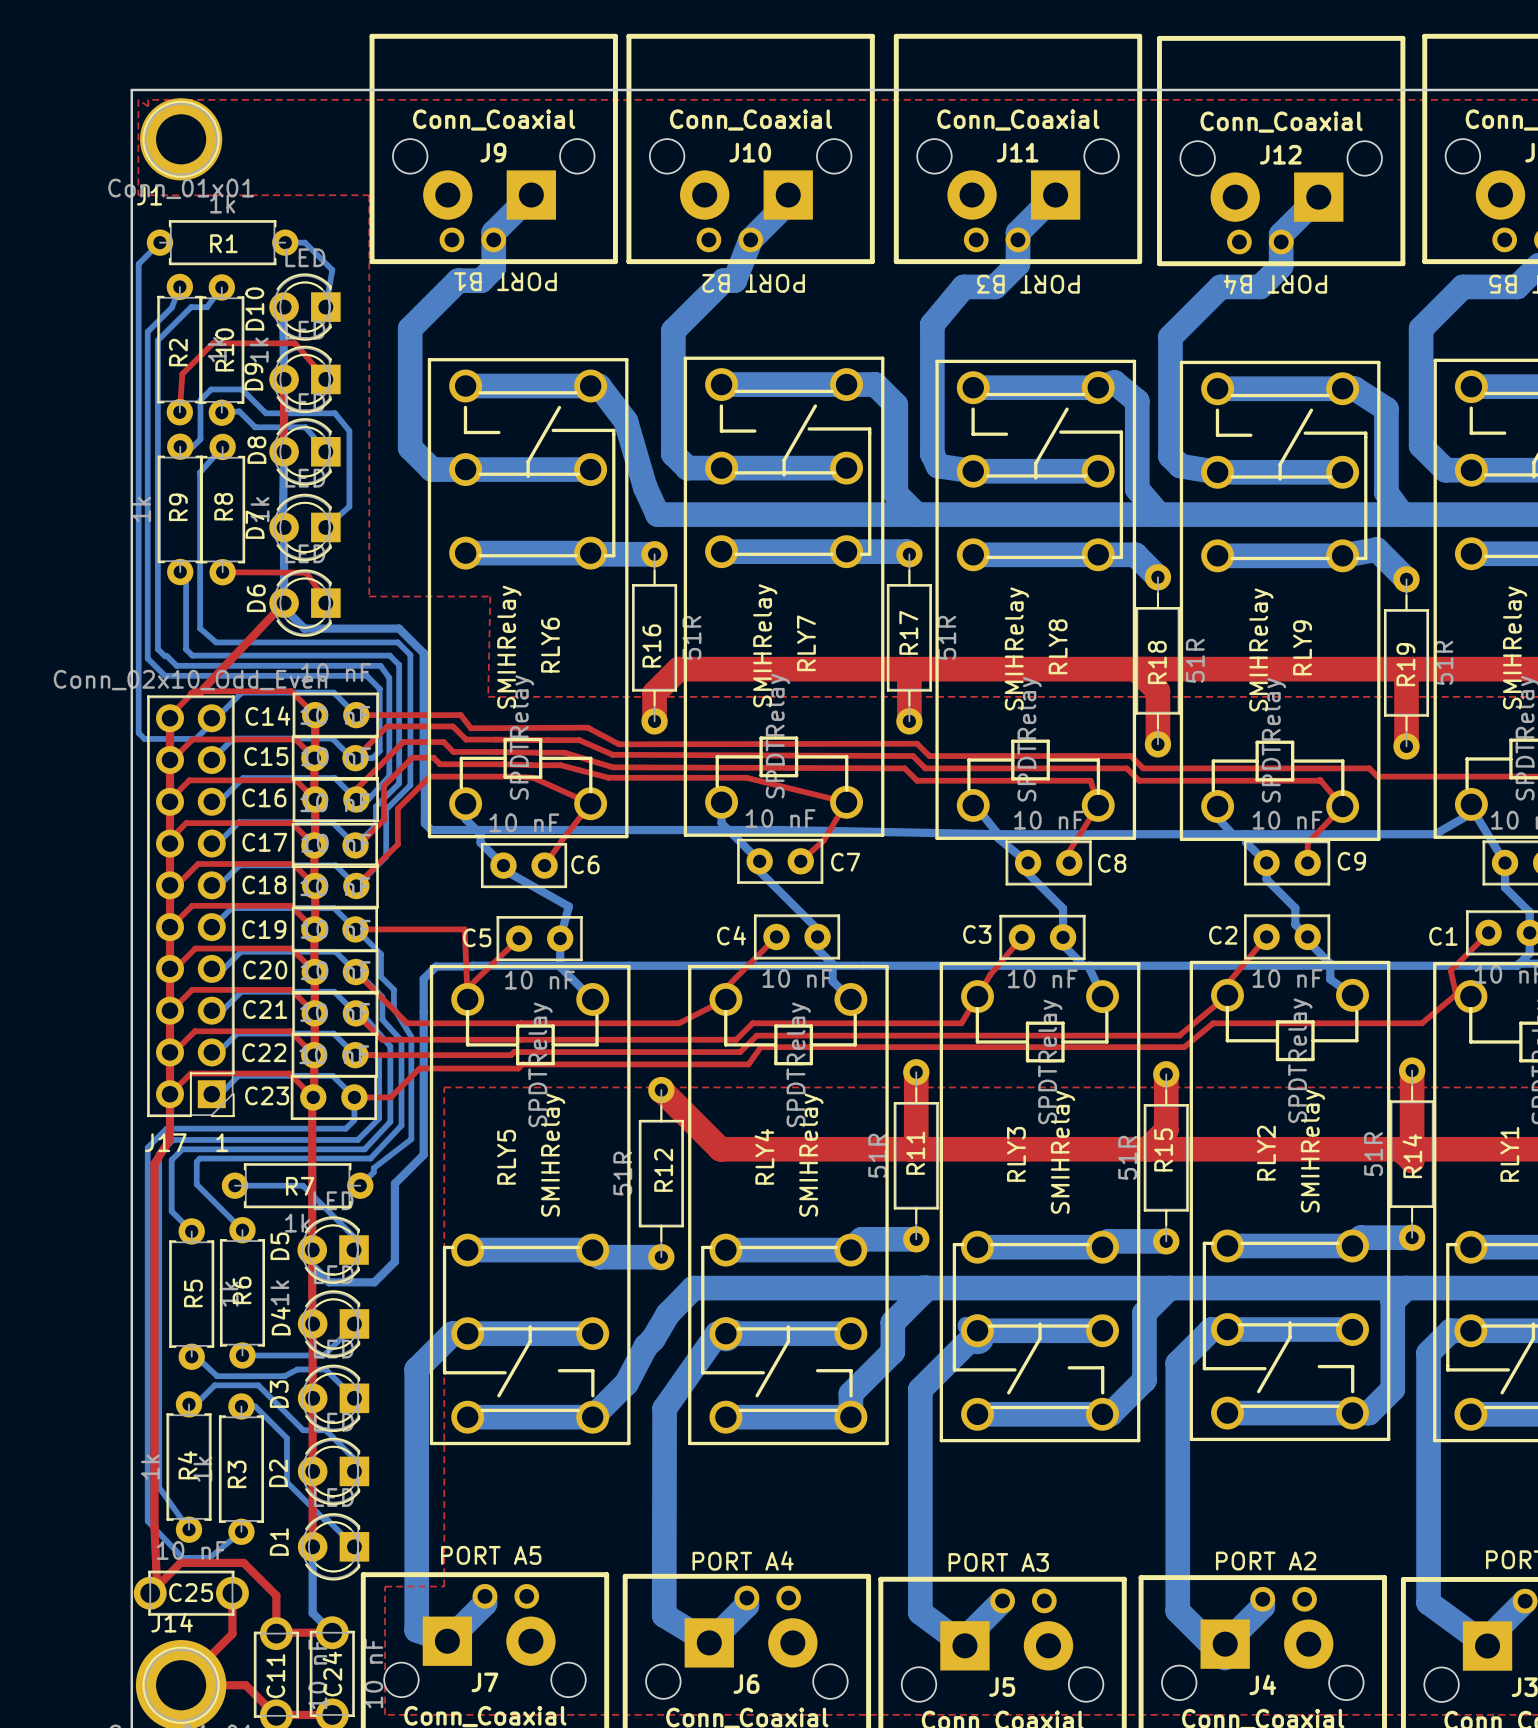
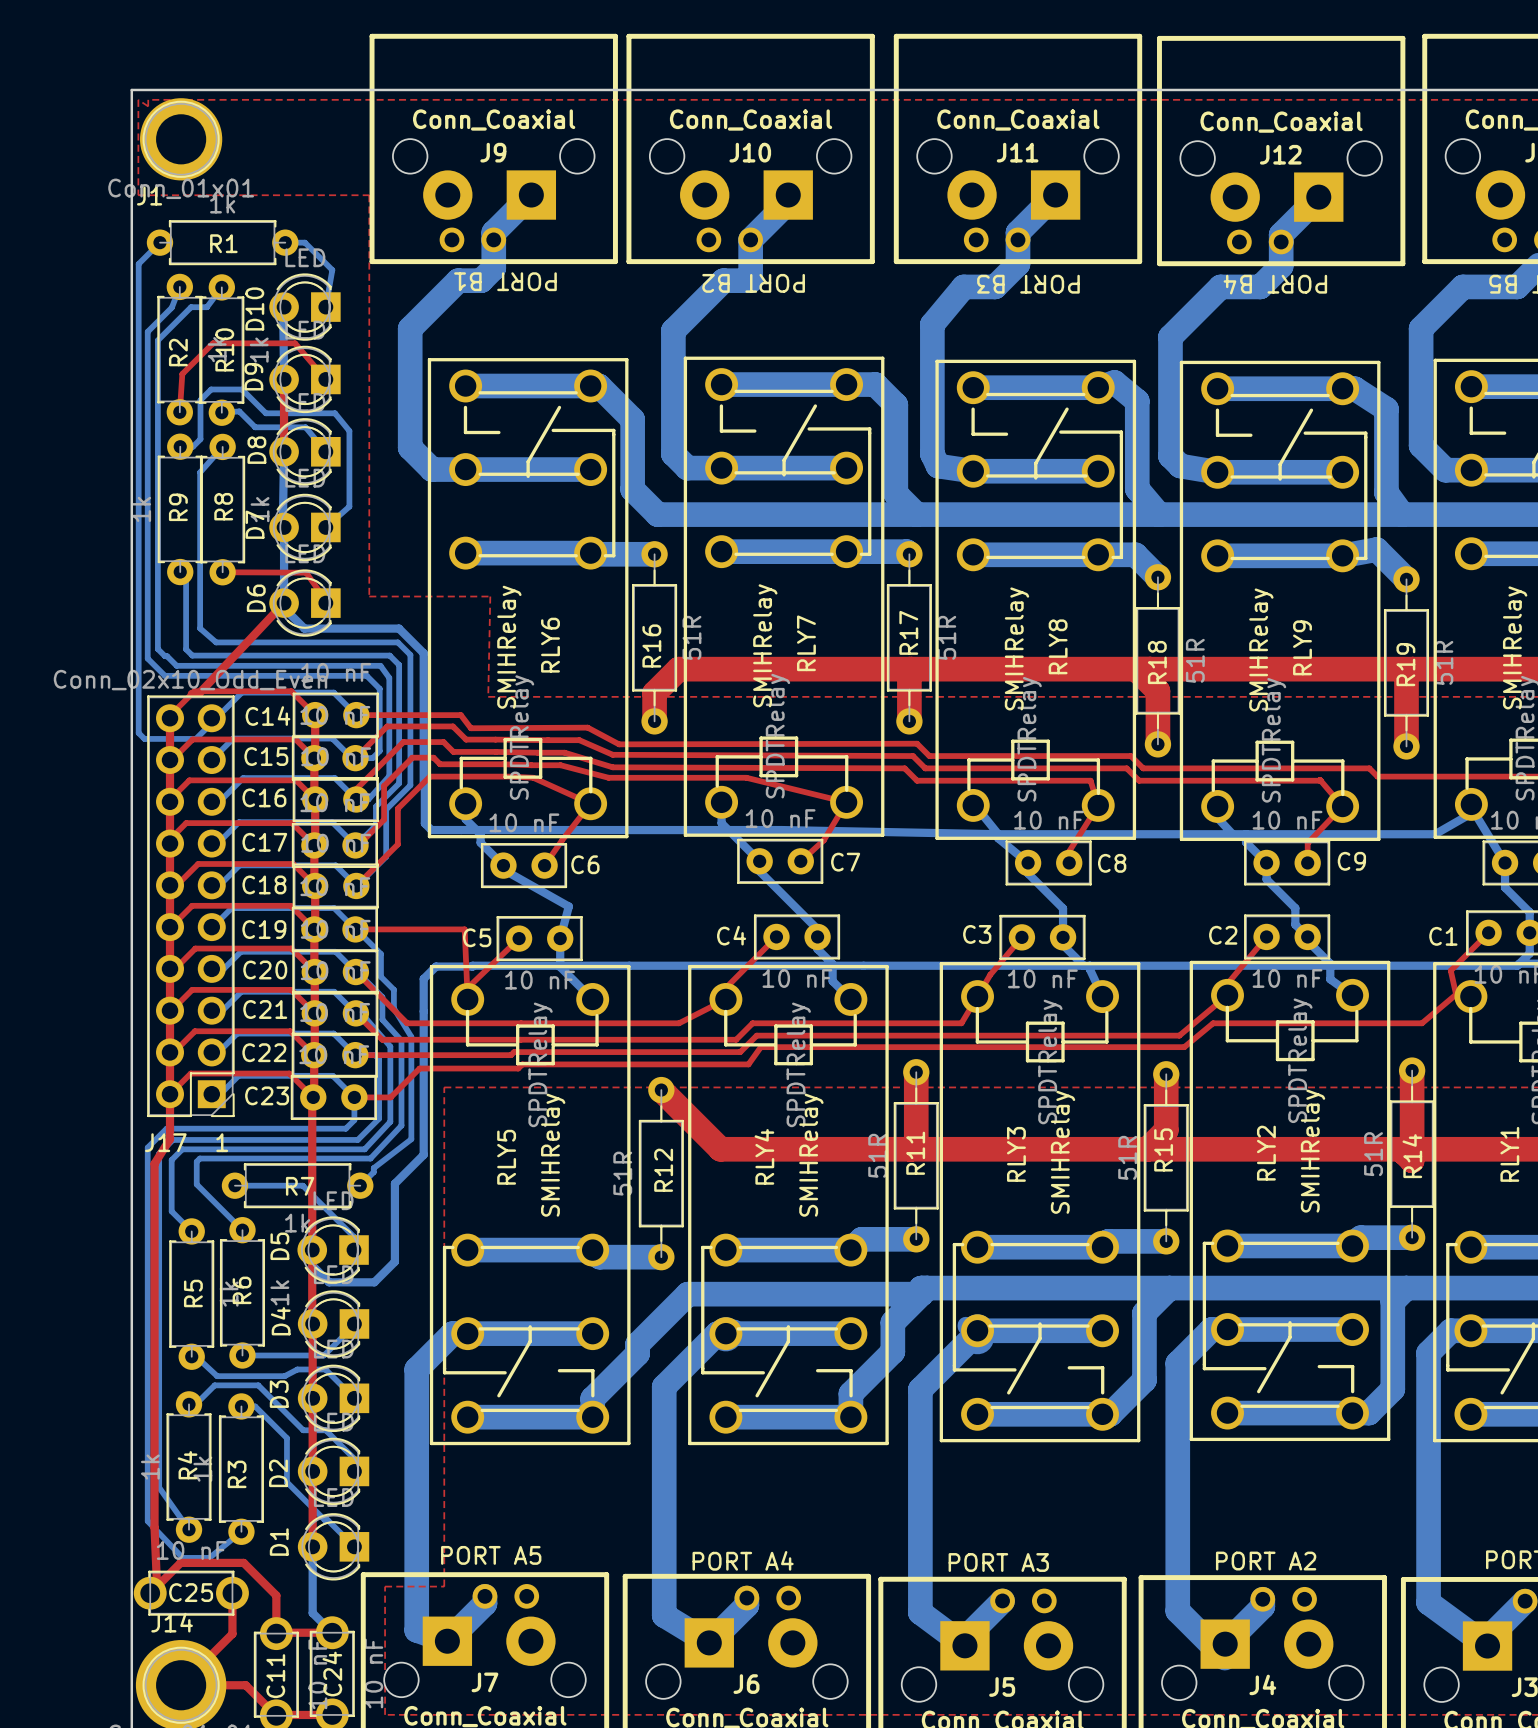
bottom track: (750, 239) (734, 280) (723, 280) -> (750, 239) (750, 280) (723, 280)
bottom track: (599, 386) (625, 421) (645, 487) (657, 514) -> (599, 386) (632, 419) (632, 489) (657, 514)
bottom track: (921, 1288) (693, 1288) (667, 1314) (653, 1339) (645, 1346) (626, 1383) (592, 1417) -> (921, 1288) (921, 1294) (687, 1294) (637, 1344) (637, 1353) (592, 1398) (592, 1417)
bottom track: (717, 1333) (664, 1408) (664, 1615) -> (717, 1333) (664, 1386) (664, 1615)

